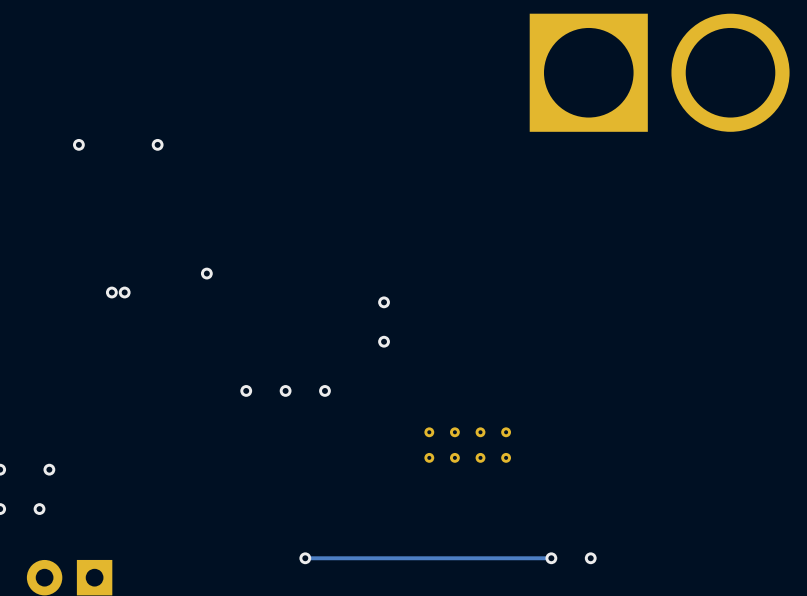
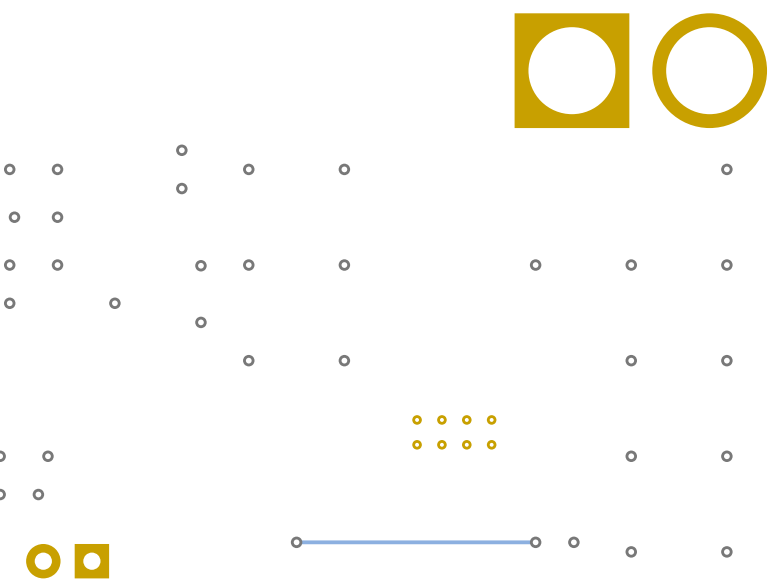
via position: (78, 144) -> (57, 169)
via: (157, 144) -> none
via: none -> (181, 150)
via: none -> (9, 169)
via: none -> (248, 169)
via: none -> (344, 169)
via: none -> (726, 169)
via: none -> (181, 188)
via: none -> (14, 217)
via: none -> (57, 217)
via: none -> (9, 265)
via: none -> (57, 265)
via: none -> (248, 265)
via: none -> (344, 265)
via: none -> (535, 265)
via: none -> (631, 265)
via: none -> (726, 265)
via: (111, 292) -> none
via: (124, 292) -> none
via: (384, 302) -> none
via: none -> (9, 303)
via: none -> (114, 303)
via: none -> (200, 322)
via: (384, 341) -> none
via: none -> (248, 360)
via: none -> (344, 360)
via: none -> (631, 360)
via: none -> (726, 360)
via: (246, 390) -> none
via: (285, 390) -> none
via: (324, 390) -> none
via: none -> (631, 456)
via: none -> (726, 456)
via: none -> (631, 551)
via: none -> (726, 551)

